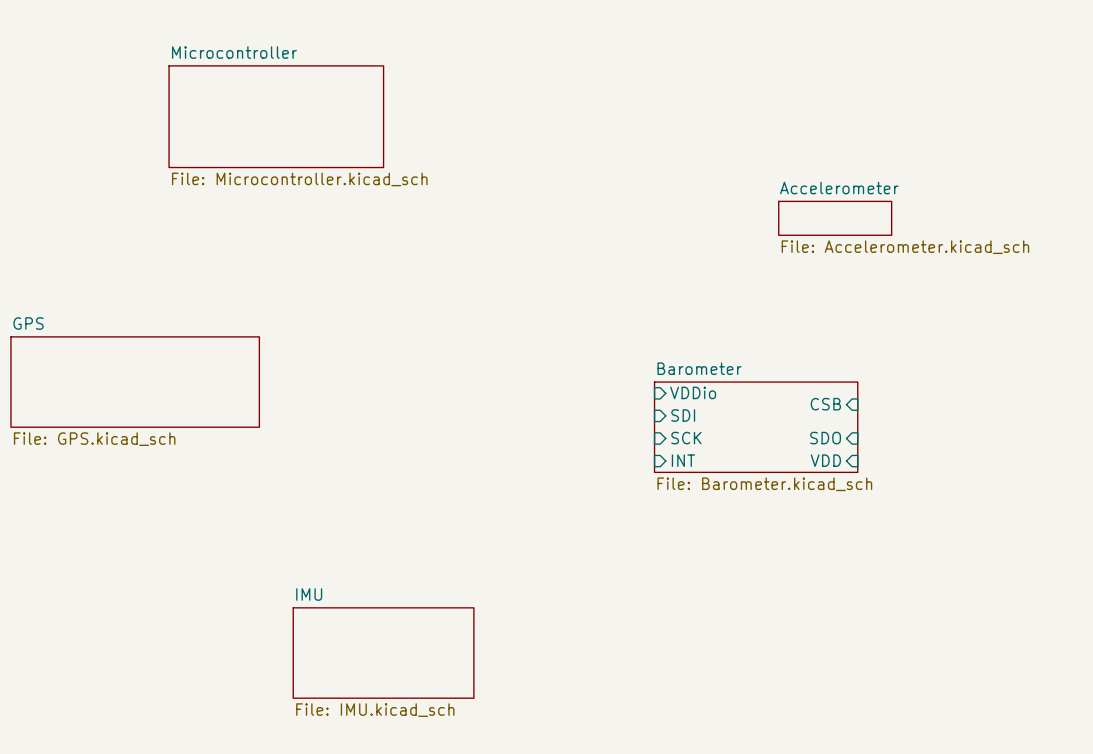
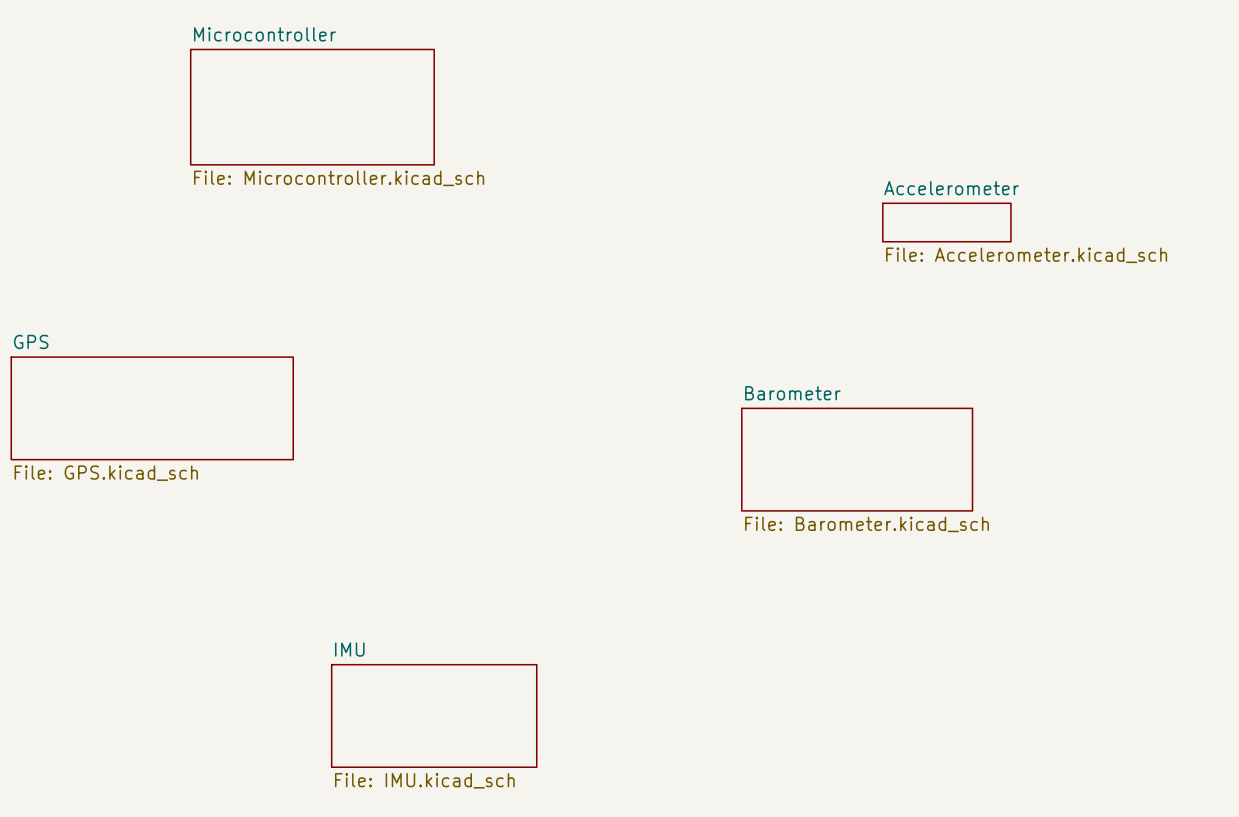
sheet pin: VDDio (693, 392) -> none
sheet pin: CSB (825, 404) -> none
sheet pin: SDI (683, 415) -> none
sheet pin: SCK (686, 438) -> none
sheet pin: SDO (825, 438) -> none
sheet pin: INT (683, 460) -> none
sheet pin: VDD (825, 460) -> none

